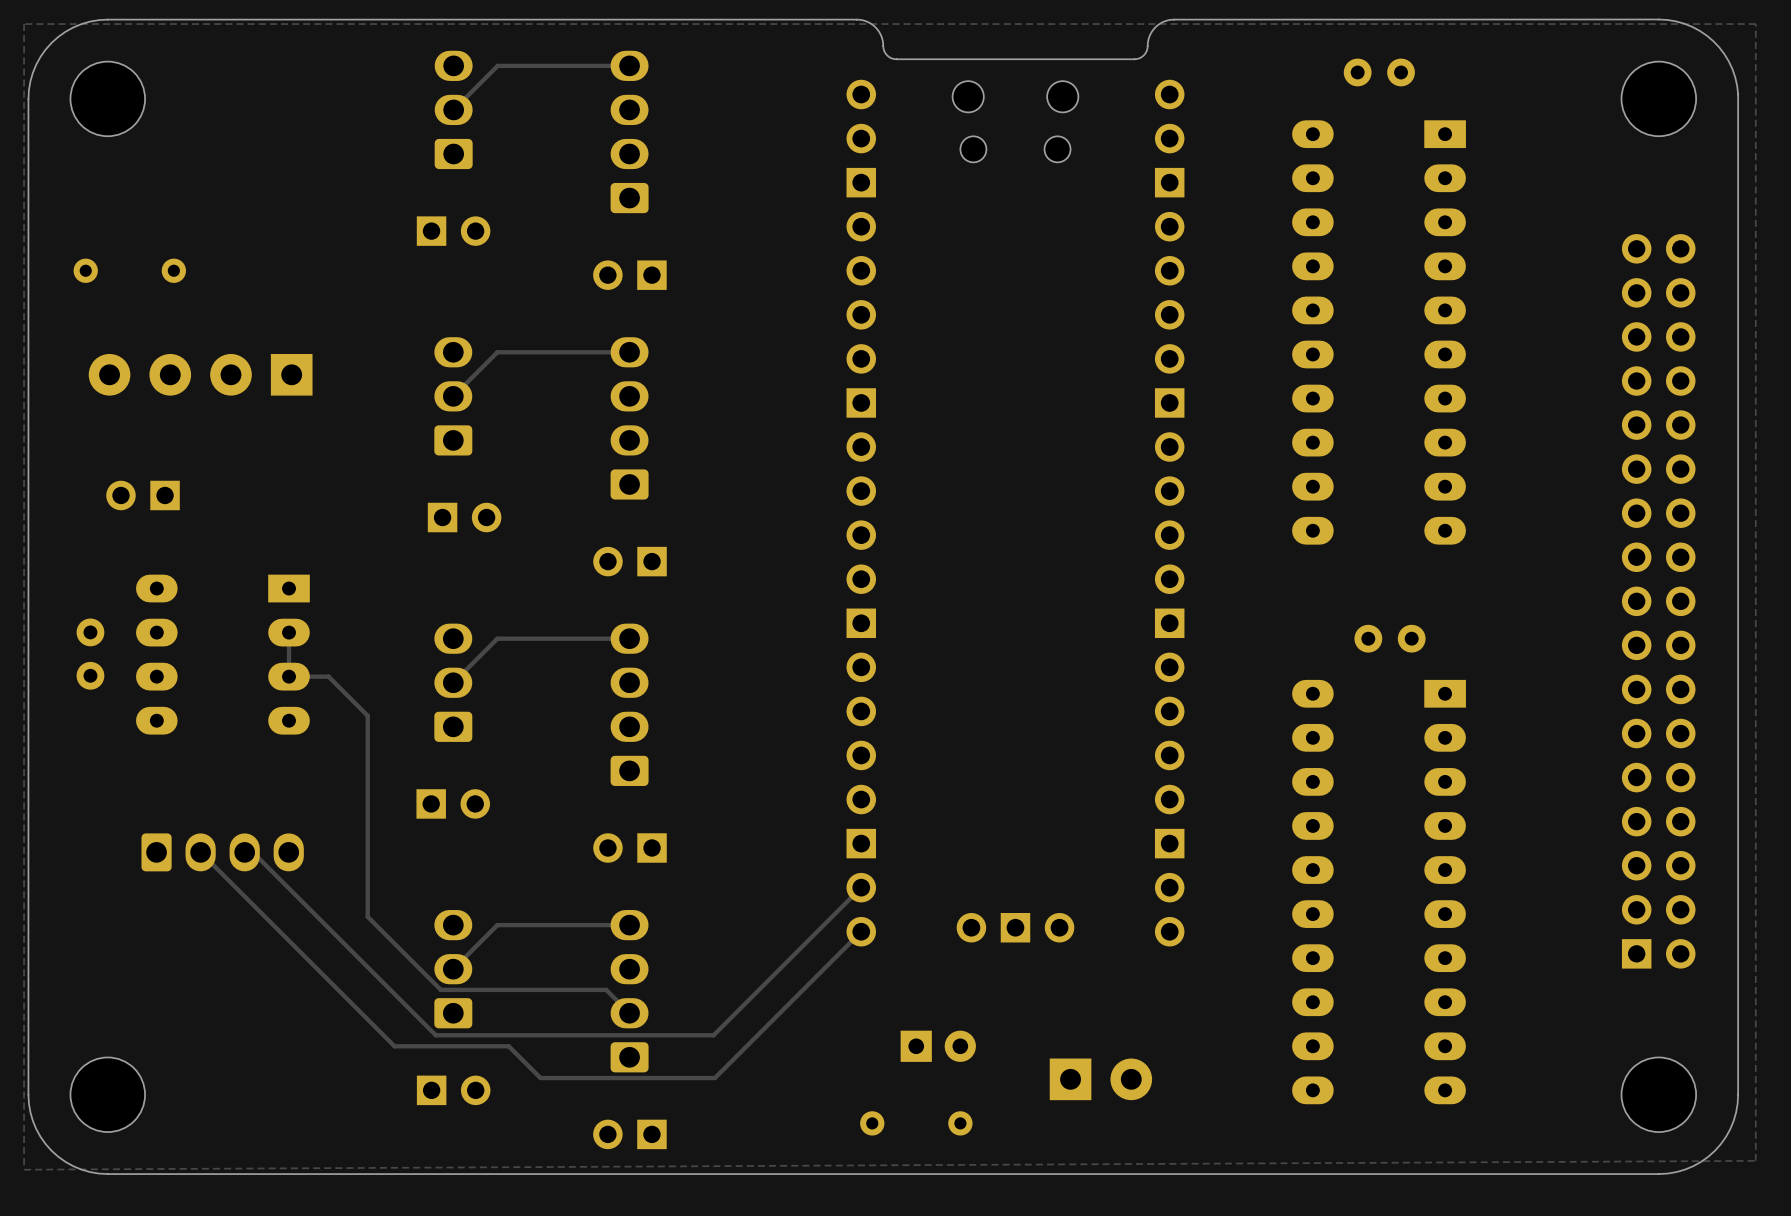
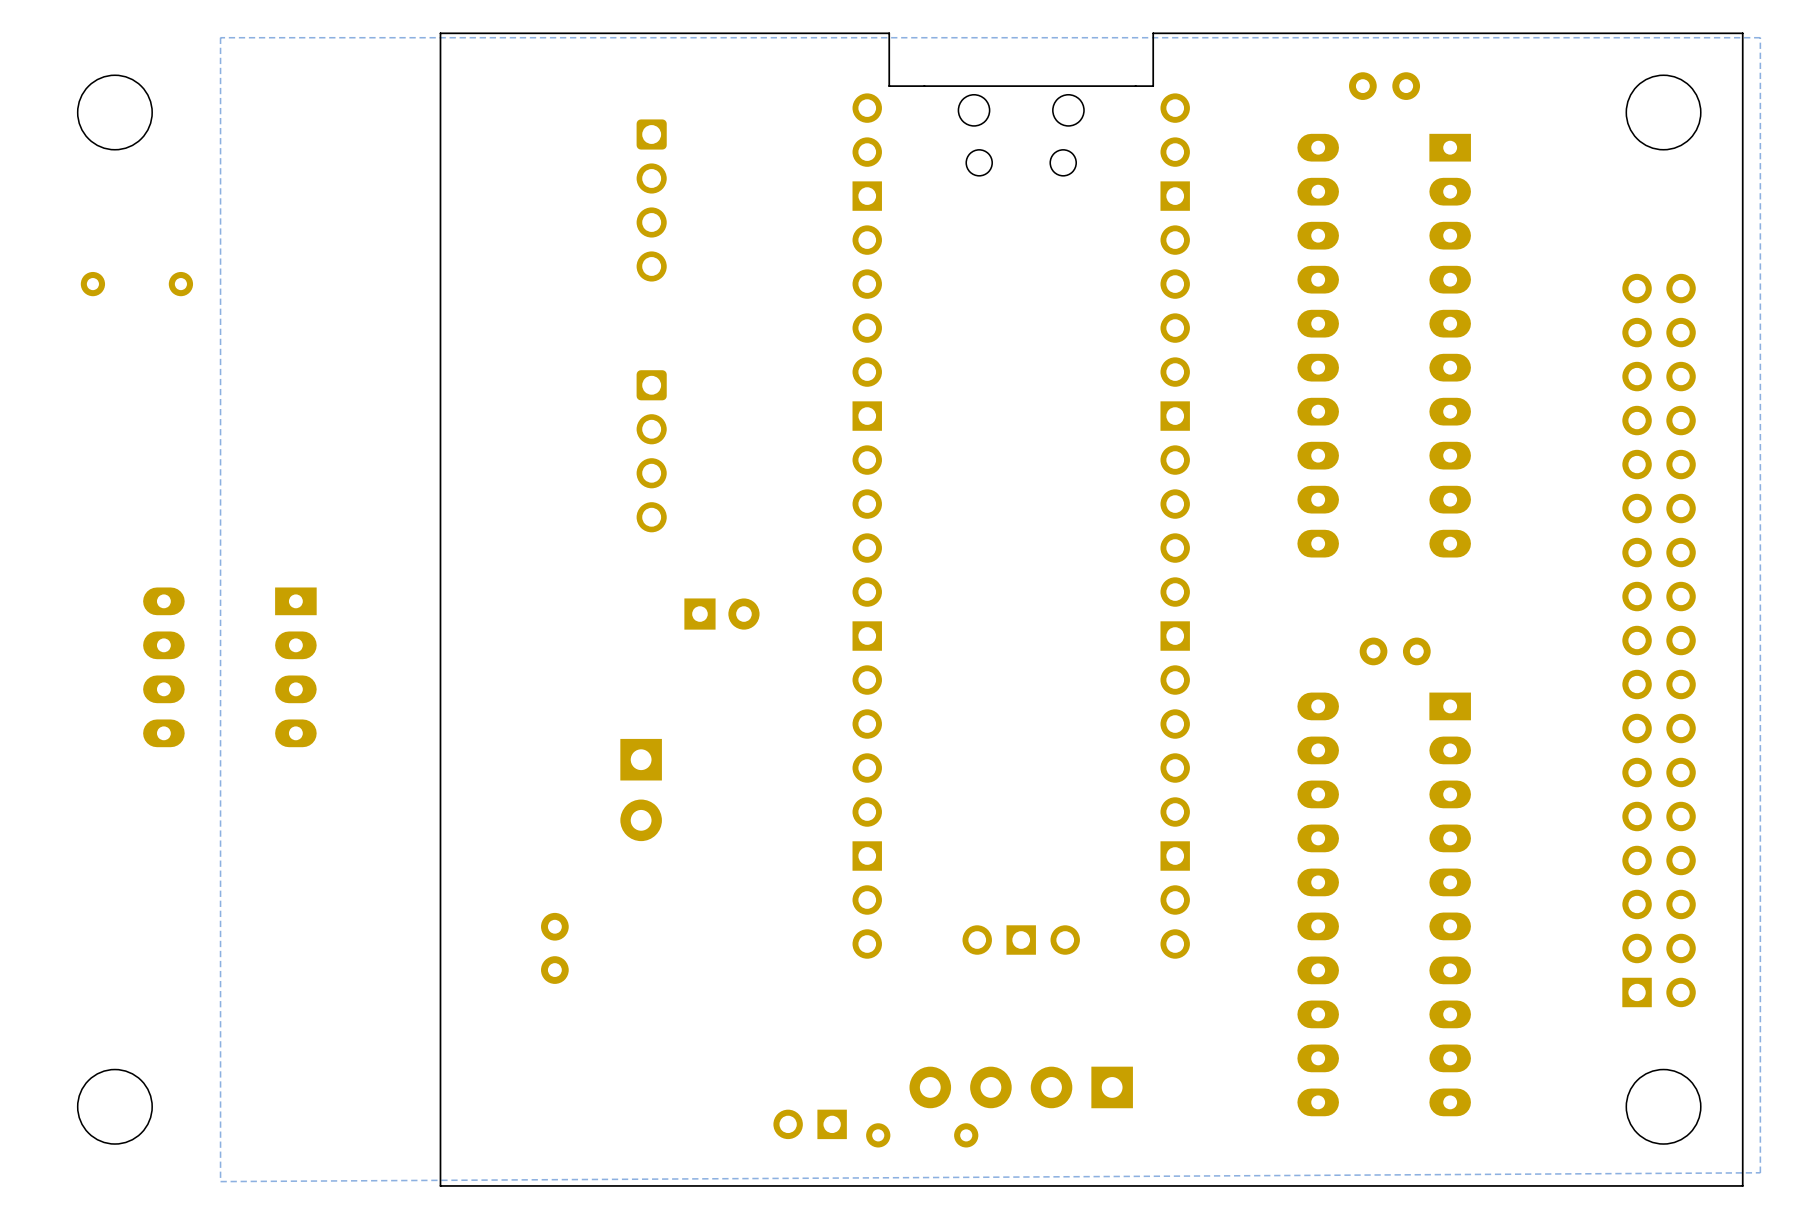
board edge: (433, 19) (107, 19) (90, 21) (65, 31) (45, 49) (32, 72) (28, 98) (28, 1094) (32, 1120) (45, 1144) (58, 1156) (73, 1166) (98, 1173) (433, 1174) -> (440, 33) (440, 1185)
board edge: (856, 19) (865, 21) (875, 27) (881, 37) (885, 52) (889, 57) (896, 59) (1136, 59) (1145, 52) (1149, 37) (1155, 27) (1165, 21) (1174, 19) (1667, 19) (1692, 26) (1713, 41) (1724, 54) (1732, 69) (1738, 94) -> (862, 33) (889, 33) (889, 86) (1153, 86) (1153, 33) (1742, 33) (1742, 108)
zone outline: (213, 24) (24, 24) (24, 1169) (1755, 1160) -> (220, 37) (220, 1181) (1760, 1172)
track: (629, 65) (497, 65) (453, 109) -> none
part: (453, 109) -> none
part: (629, 131) -> none
part: none -> (651, 200)
part: (453, 231) -> none
part: (629, 275) -> none
track: (629, 352) (497, 352) (453, 396) -> none
part: (200, 374) -> none
part: (453, 396) -> none
part: (629, 418) -> none
part: none -> (651, 451)
part: (143, 495) -> none
part: (464, 517) -> none
part: (630, 561) -> none
part: none -> (721, 614)
part position: (1658, 601) -> (1659, 640)
track: (289, 632) (289, 676) (328, 676) (367, 715) (367, 916) (440, 989) (606, 989) (629, 1013) -> none
track: (629, 638) (497, 638) (453, 682) -> none
part: (90, 654) -> none
part: (453, 682) -> none
part: (629, 704) -> none
part: none -> (641, 790)
part: (453, 803) -> none
part: (630, 848) -> none
track: (200, 852) (394, 1046) (508, 1046) (540, 1078) (714, 1078) (861, 931) -> none
part: (222, 852) -> none
track: (244, 852) (252, 852) (435, 1035) (713, 1035) (861, 887) -> none
track: (629, 925) (497, 925) (453, 969) -> none
part: none -> (554, 948)
part: (453, 969) -> none
part: (629, 991) -> none
part: (938, 1046) -> none
part: none -> (1021, 1087)
part: (1100, 1079) -> none
part: (453, 1090) -> none
board edge: (1738, 1094) (1733, 1120) (1725, 1136) (1714, 1150) (1701, 1161) (1685, 1169) (1658, 1174) -> (1742, 1106) (1742, 1185) (1663, 1185)
part: none -> (810, 1124)
part: (629, 1134) -> none

